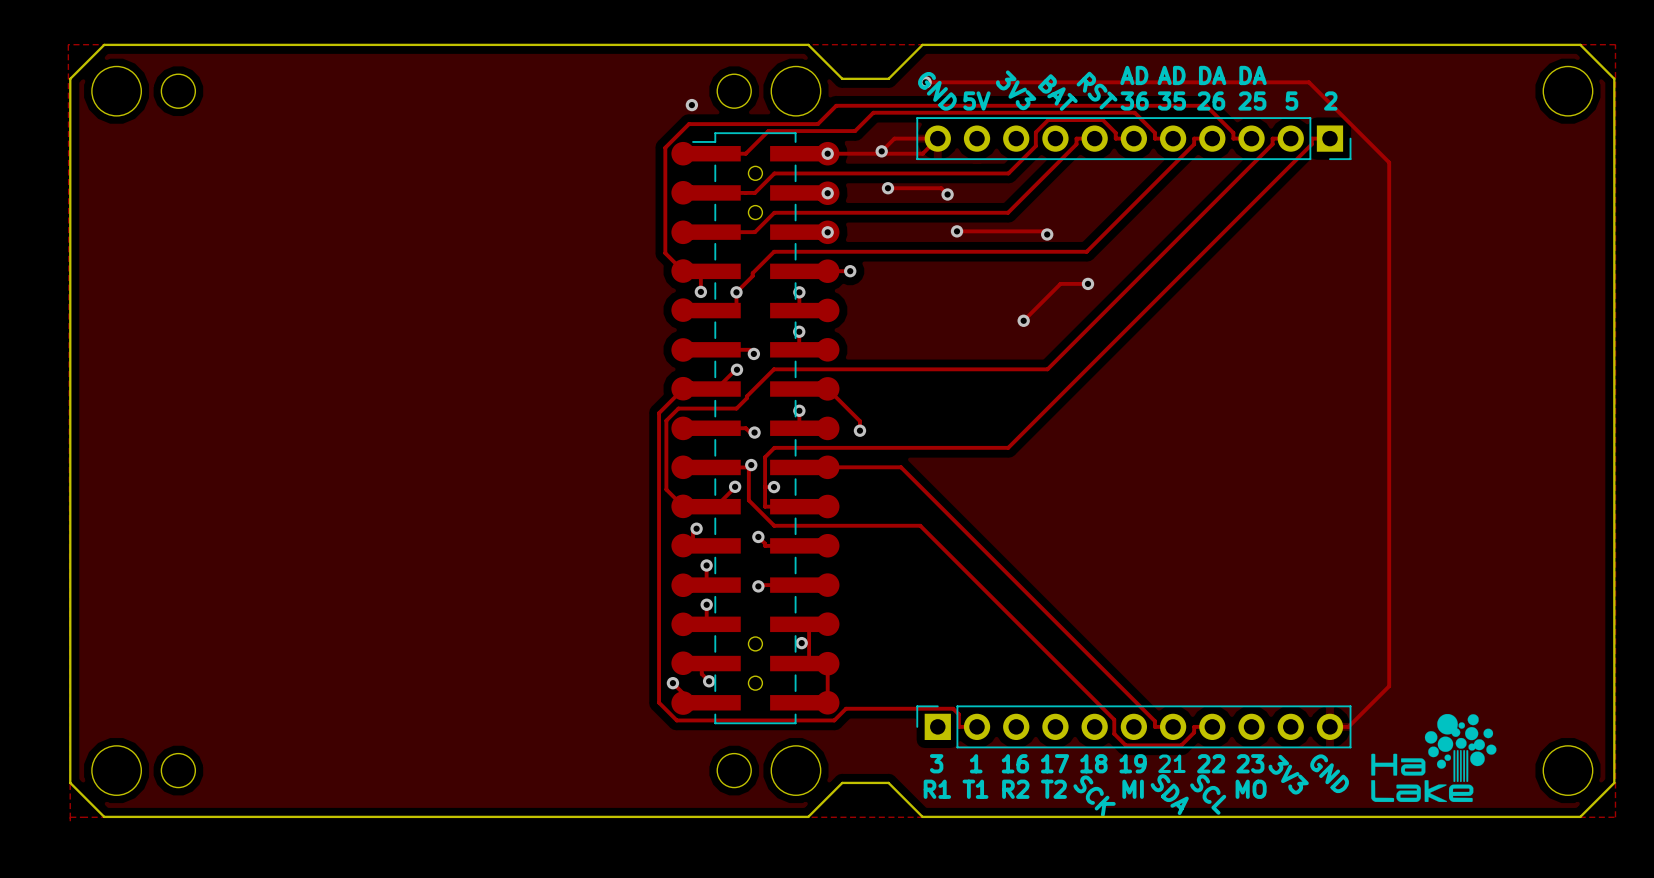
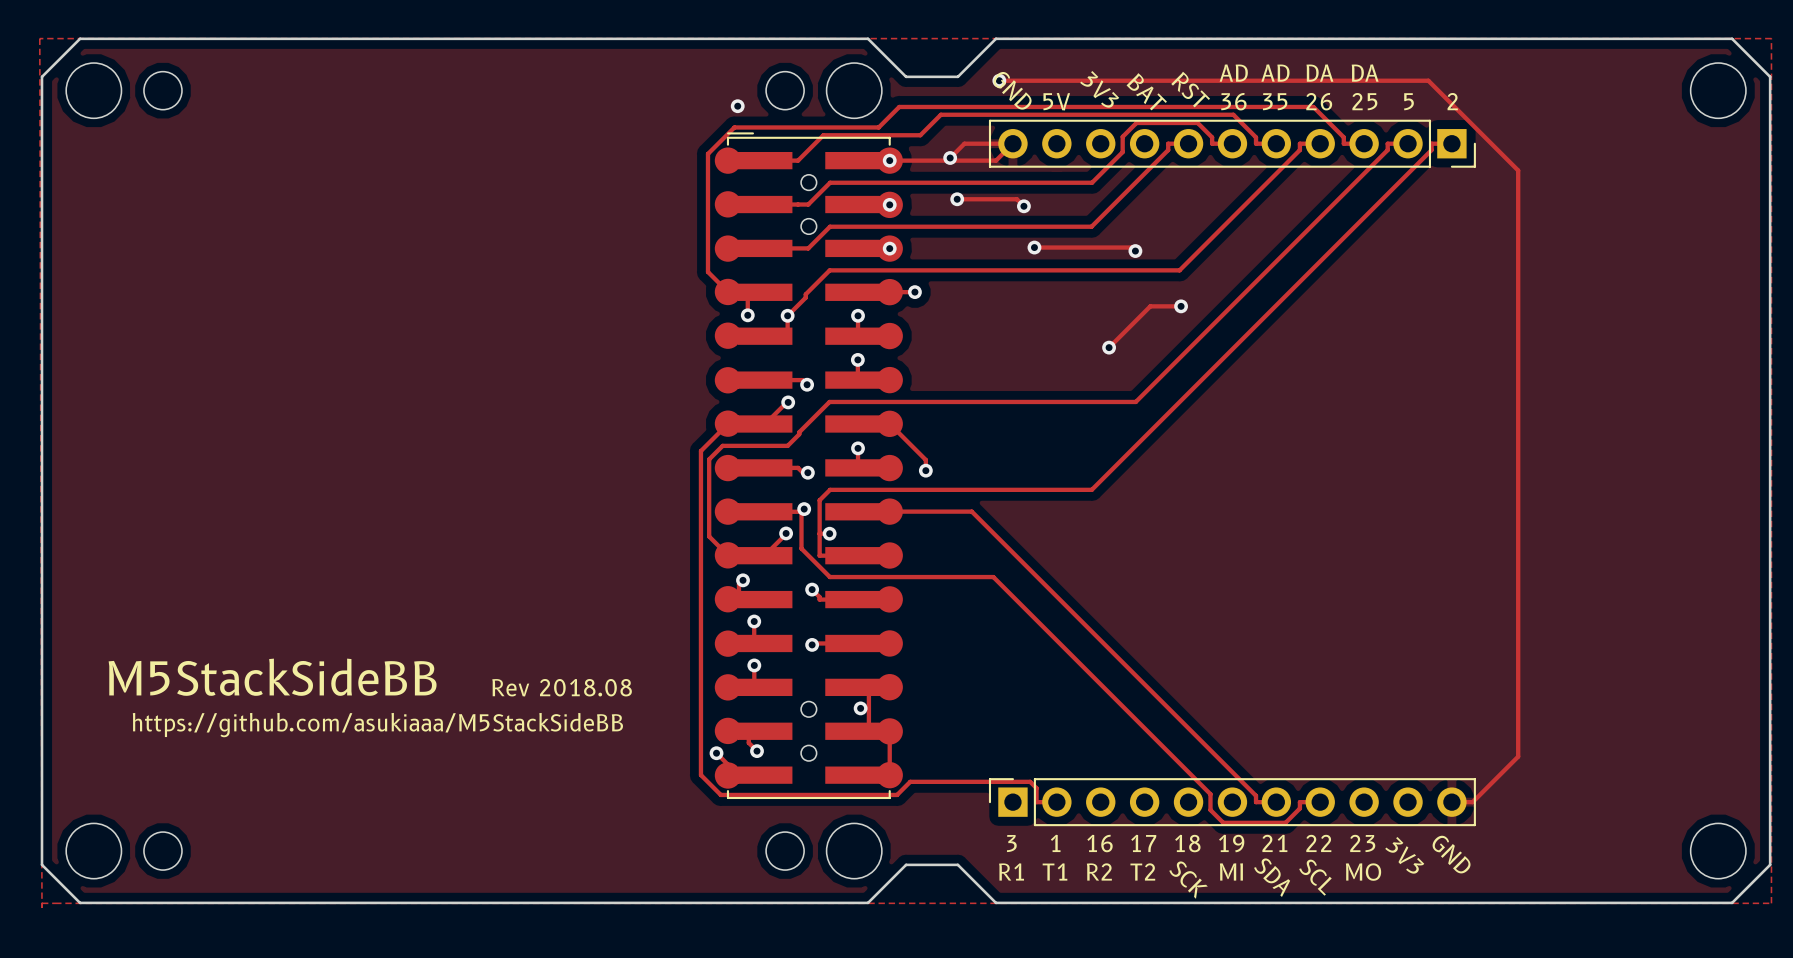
part footprint: [671, 132, 840, 725] -> [714, 132, 903, 800]
text: none -> M5StackSideBB (272, 677)
text: none -> Rev 2018.08 (562, 687)
text: none -> https://github.com/asukiaaa/M5StackSideBB (377, 725)
drawing: [1371, 714, 1497, 803] -> none

